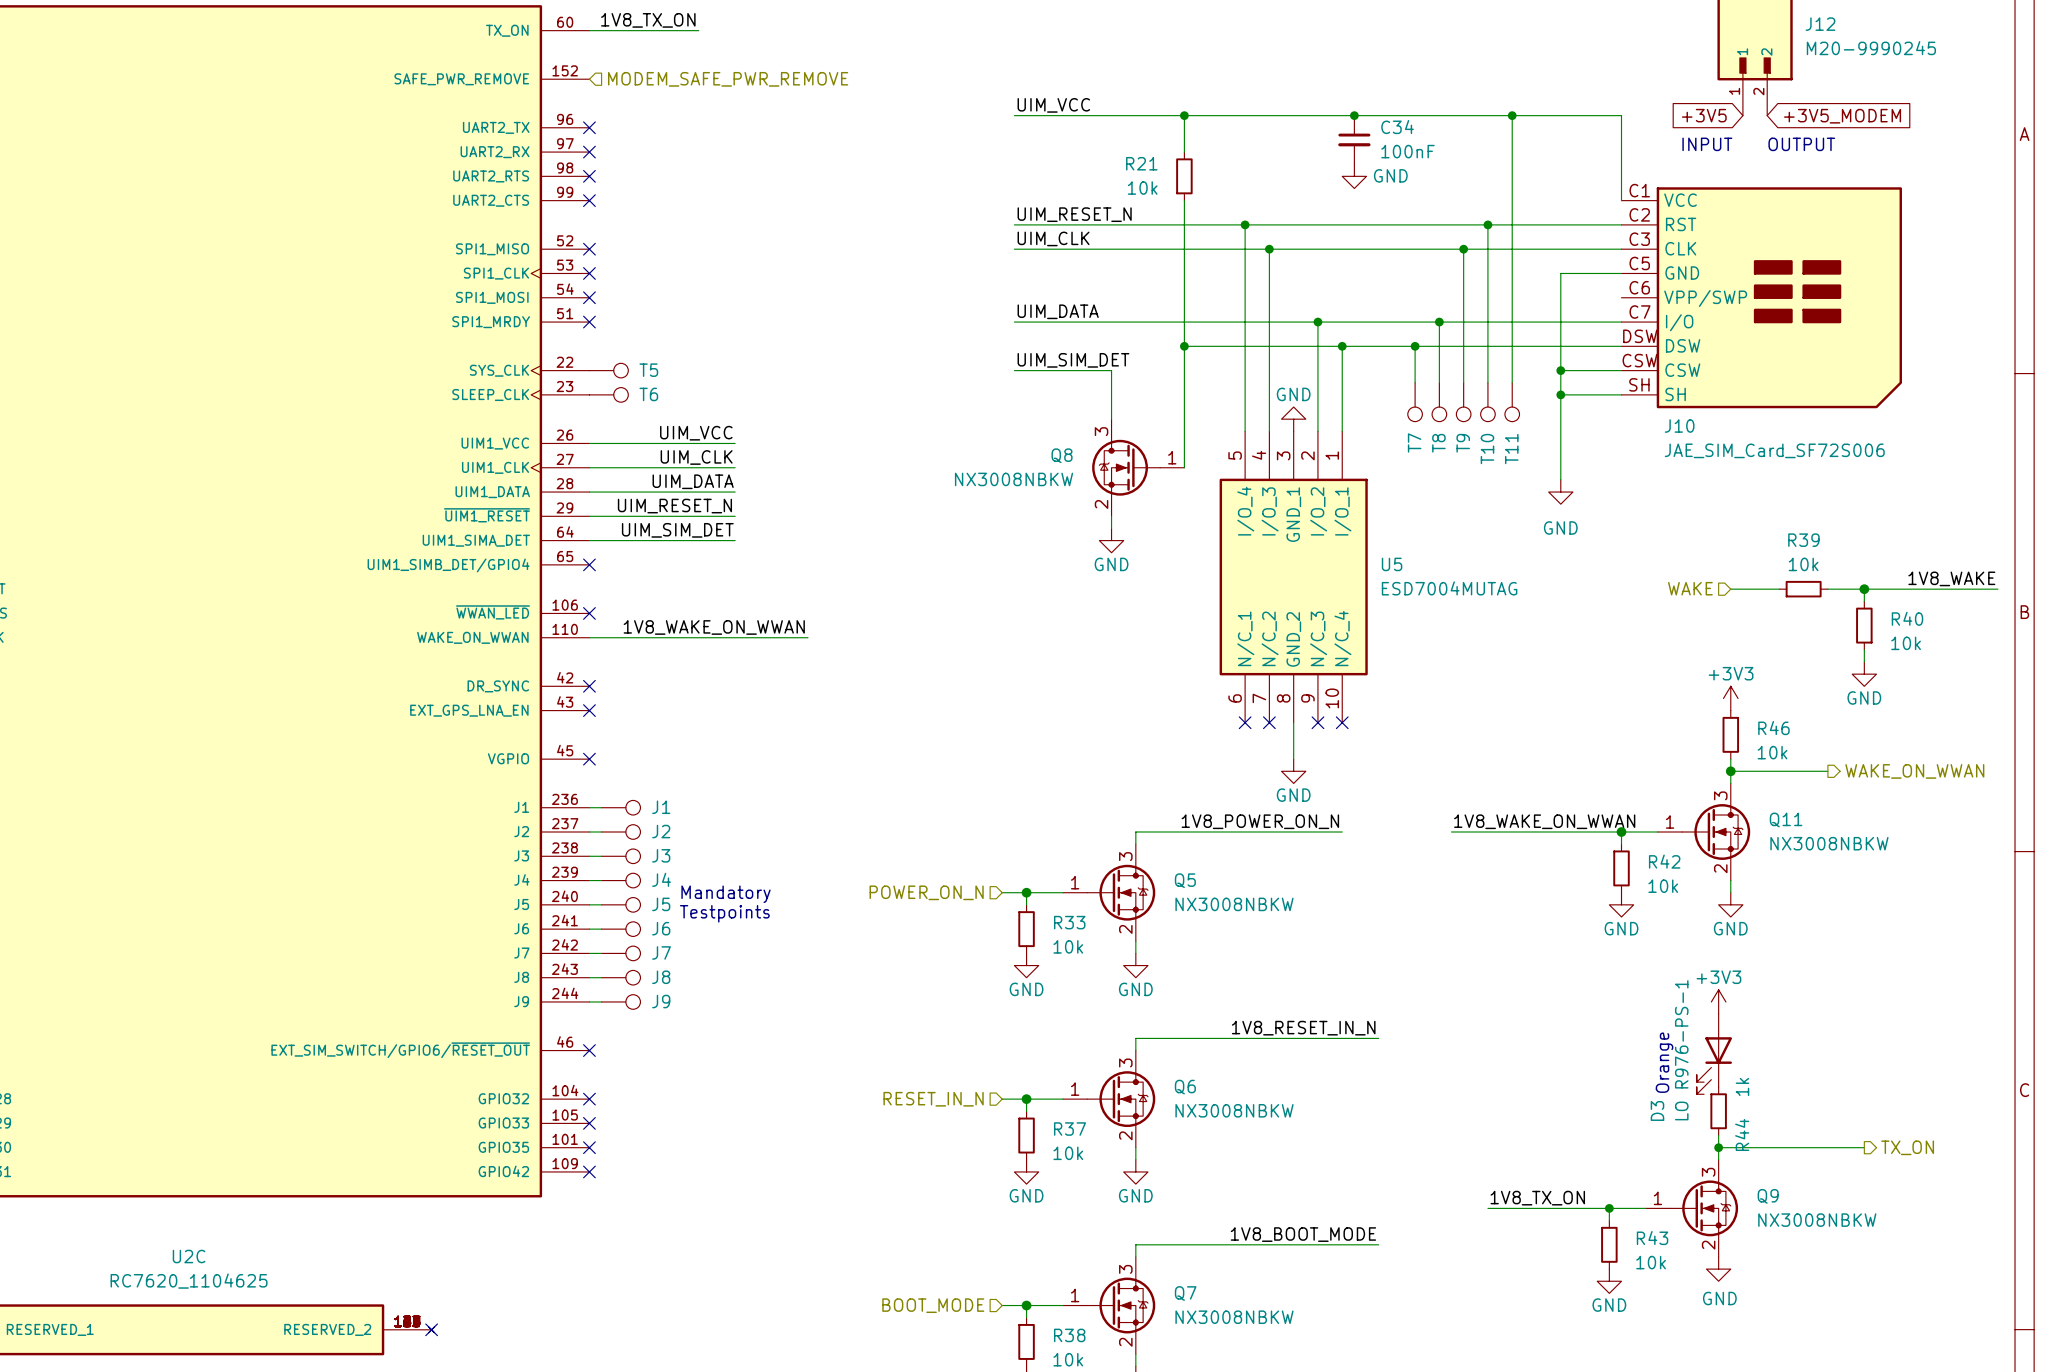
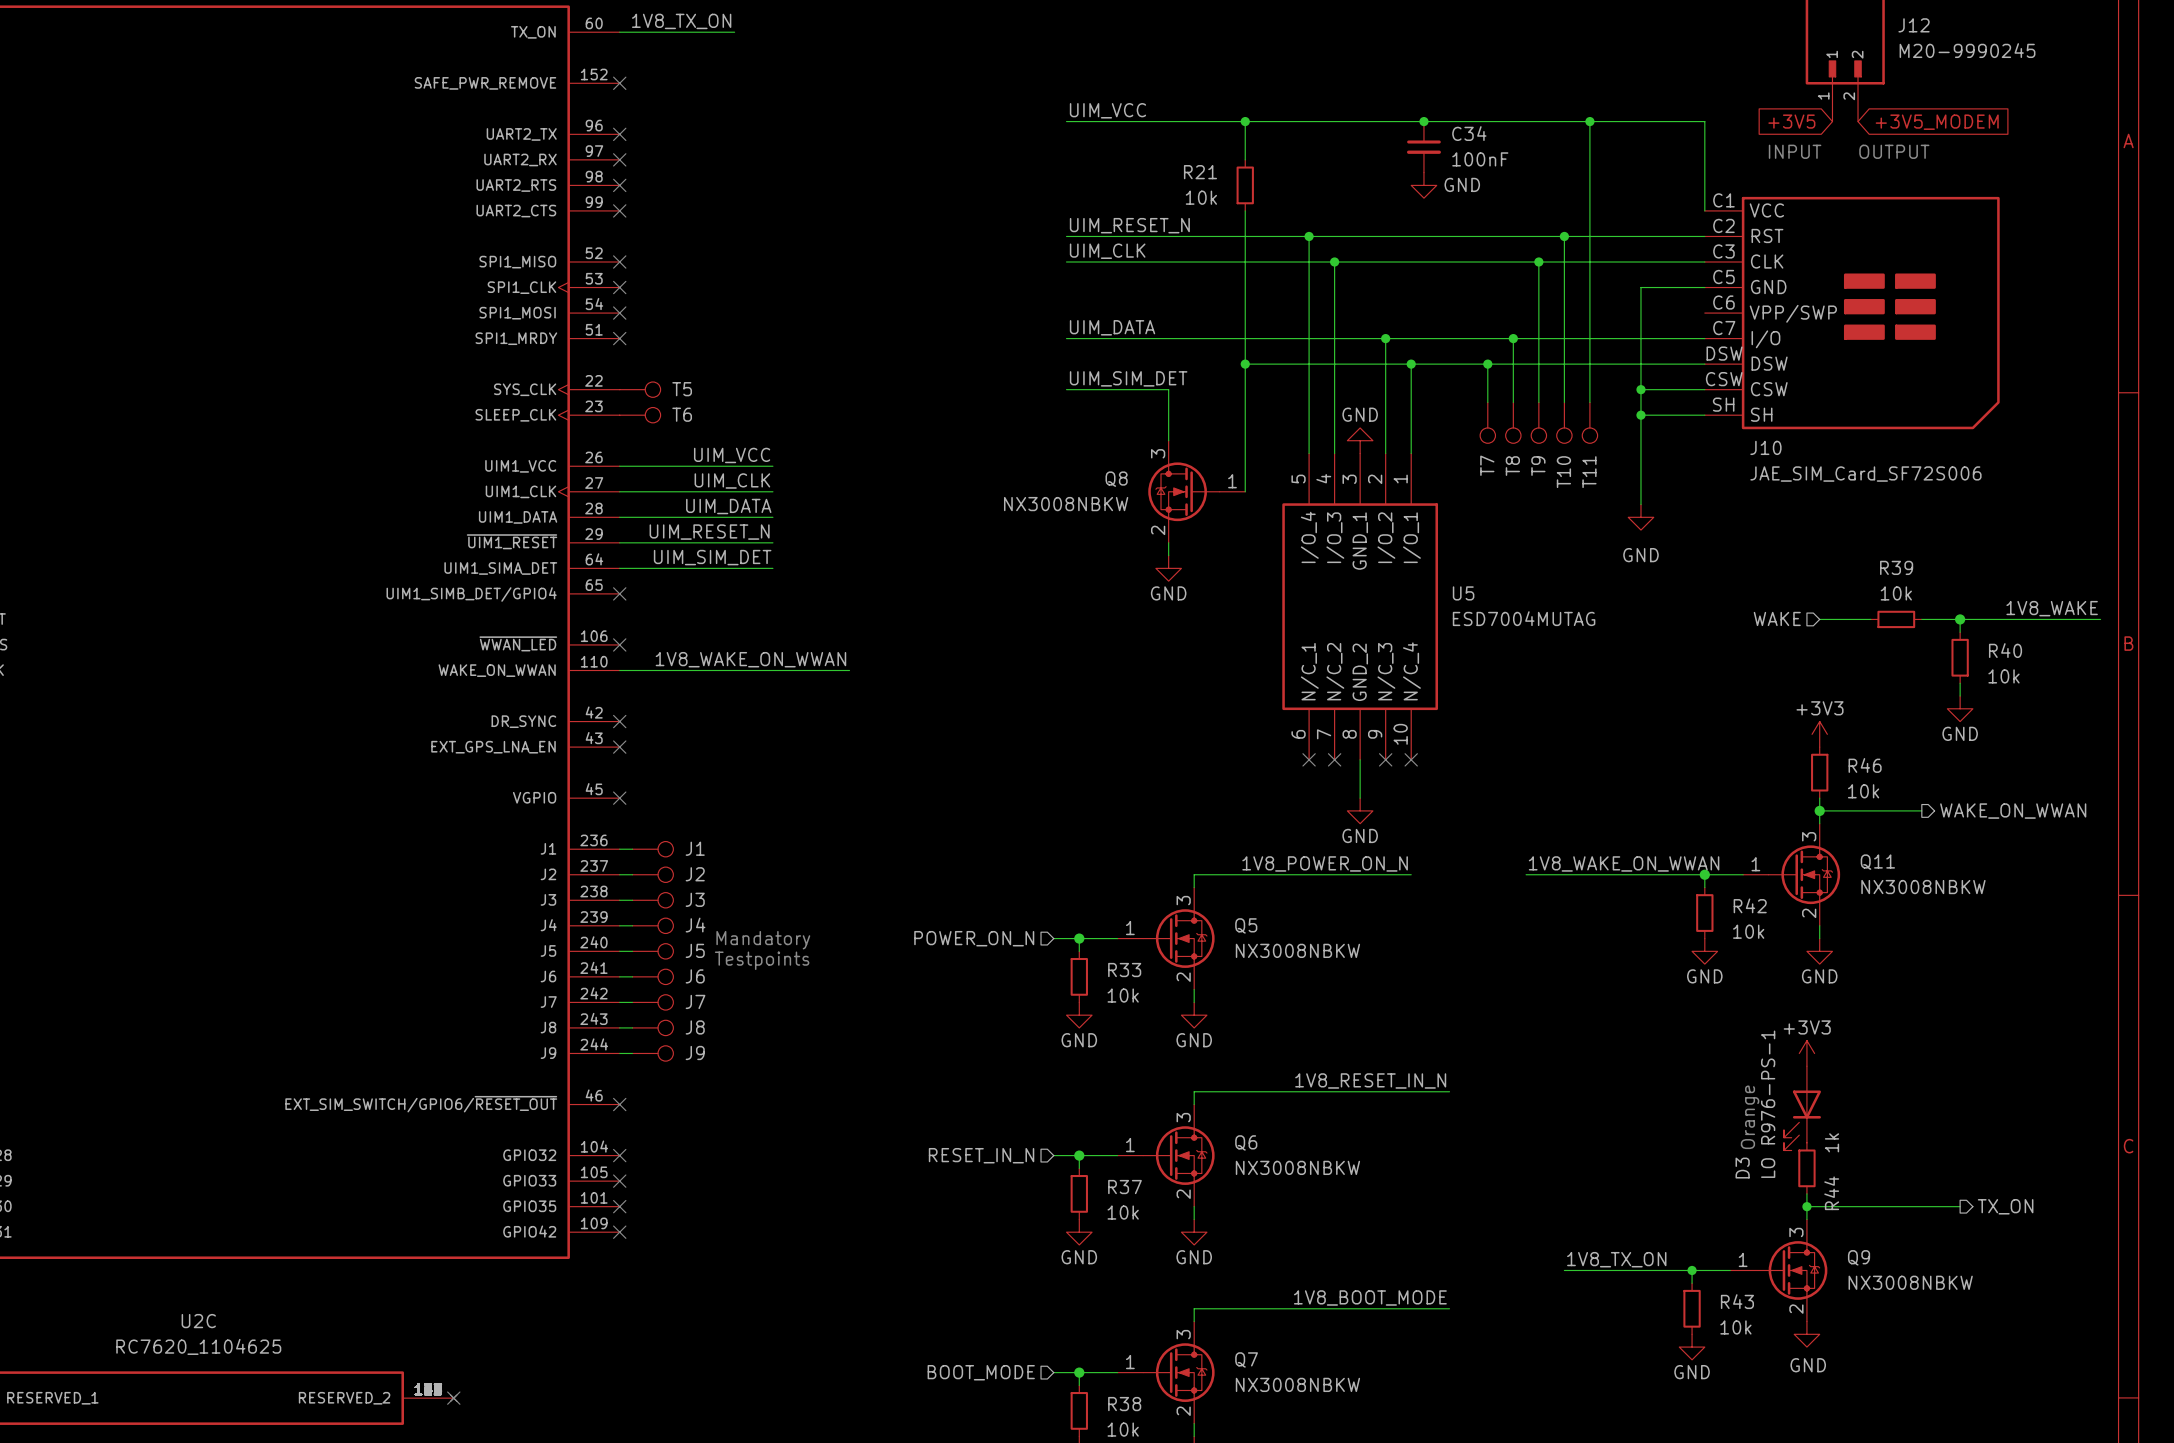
no-connect mark: none -> (619, 83)
hierarchical label: MODEM_SAFE_PWR_REMOVE (728, 79) -> none

